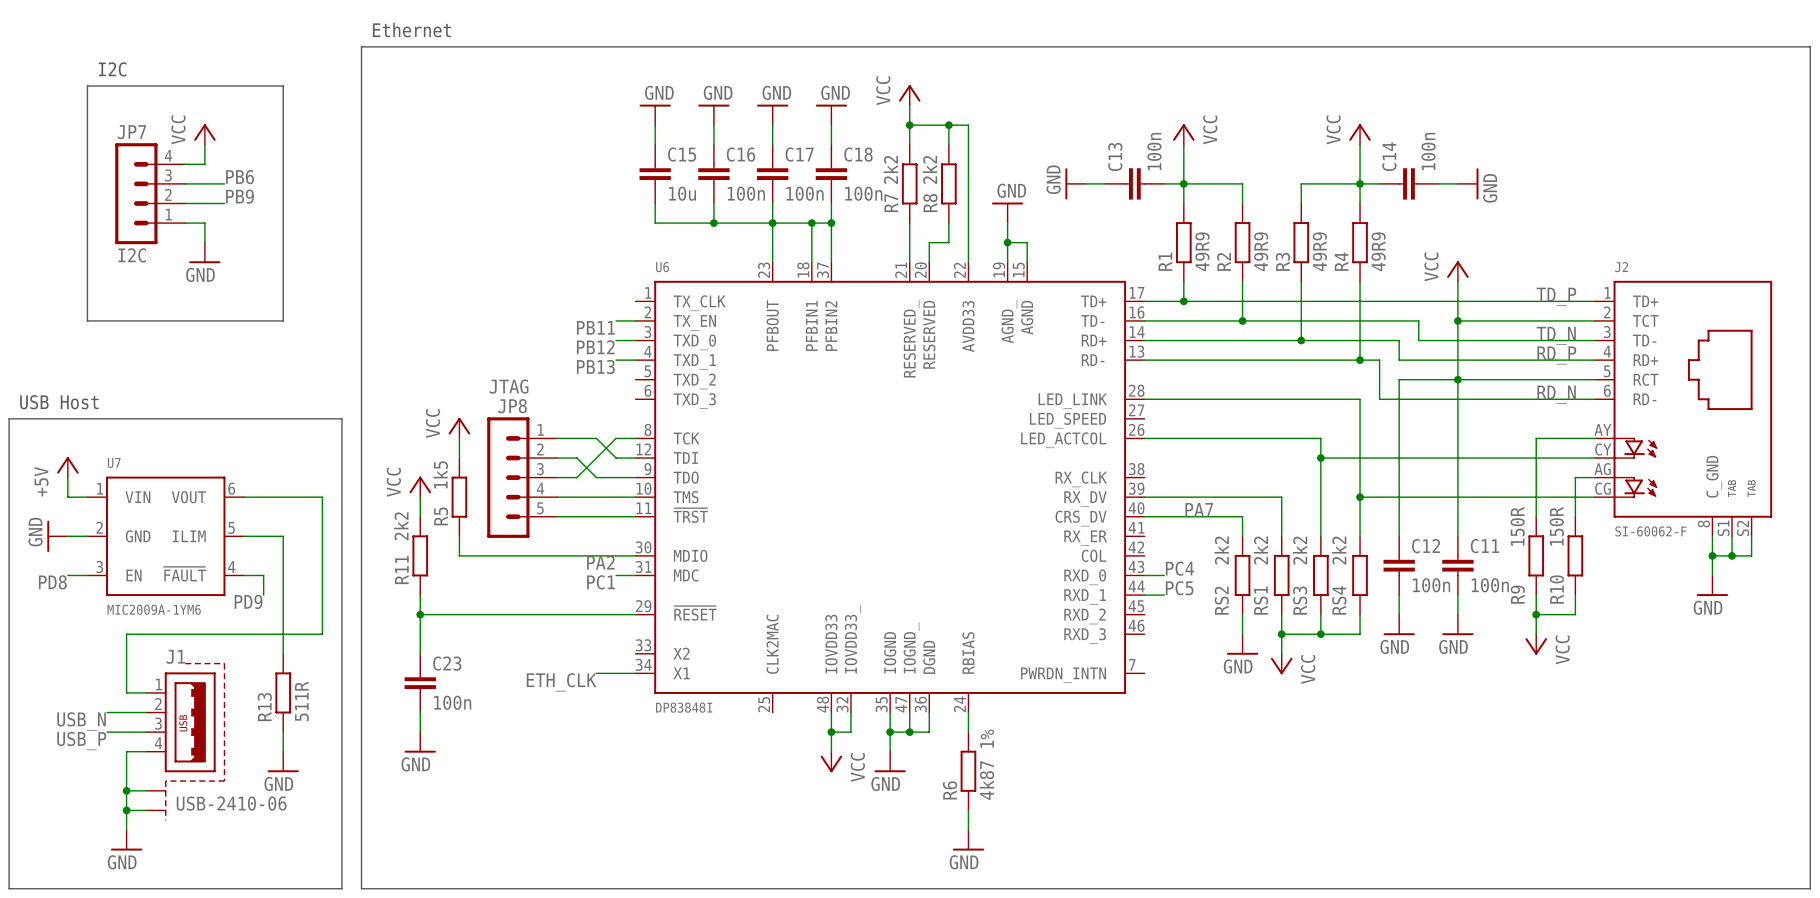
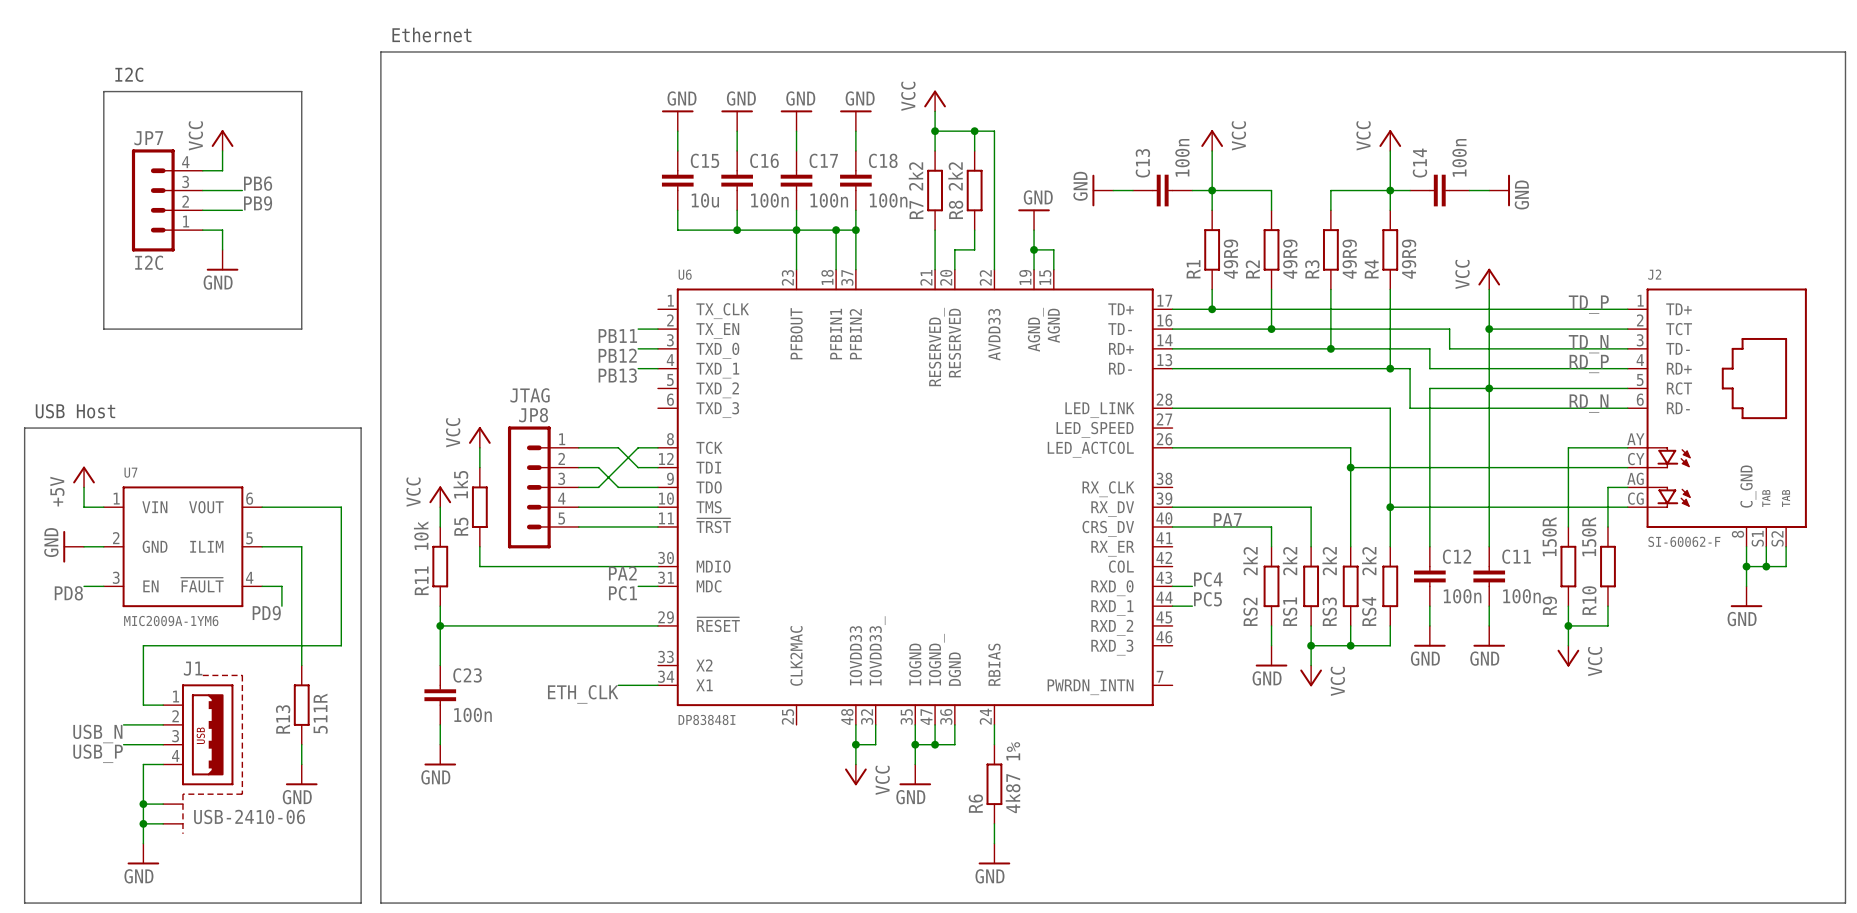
R11 value: 2k2 (401, 526) -> 10k (421, 535)

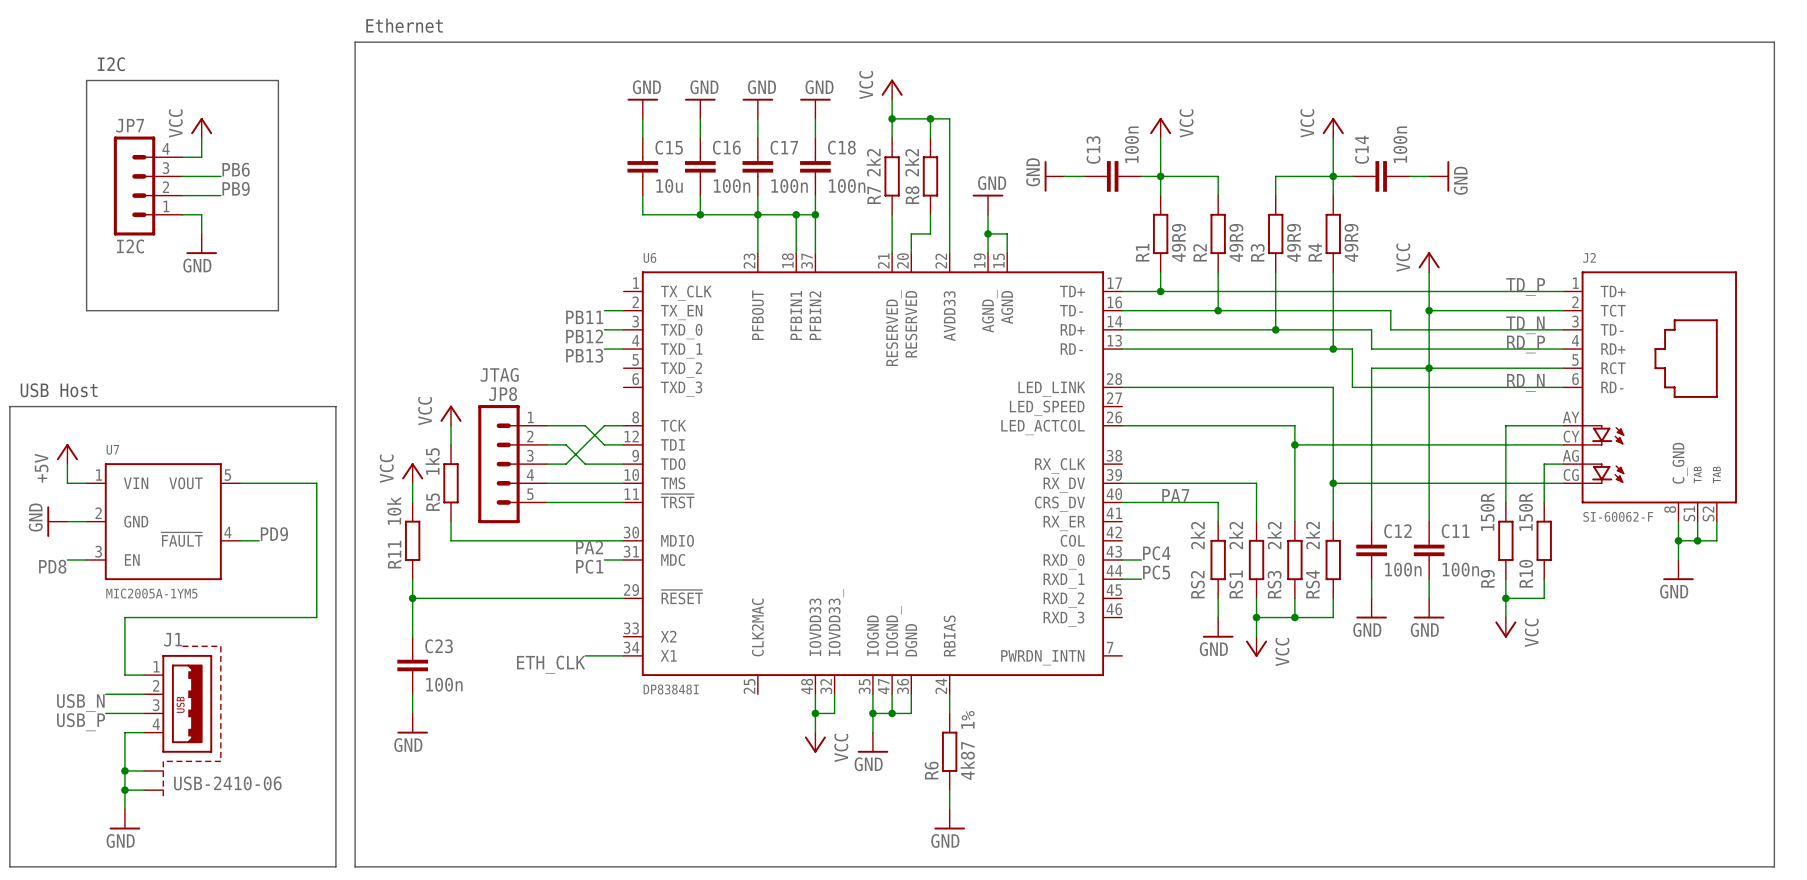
U7 symbol: [103, 486, 263, 608] -> [86, 463, 241, 581]
wire: (262, 546) (301, 546) (301, 665) -> none
wire: none -> (240, 540) (259, 540)
wire: (262, 586) (281, 586) (281, 606) -> none
label position: PD9 (266, 613) -> PD9 (274, 534)
U7 value: MIC2009A-1YM6 (171, 621) -> MIC2005A-1YM5 (151, 593)
R13: 511R (301, 705) -> none
wire: (301, 744) (301, 764) -> none
power symbol: GND (301, 774) -> none

